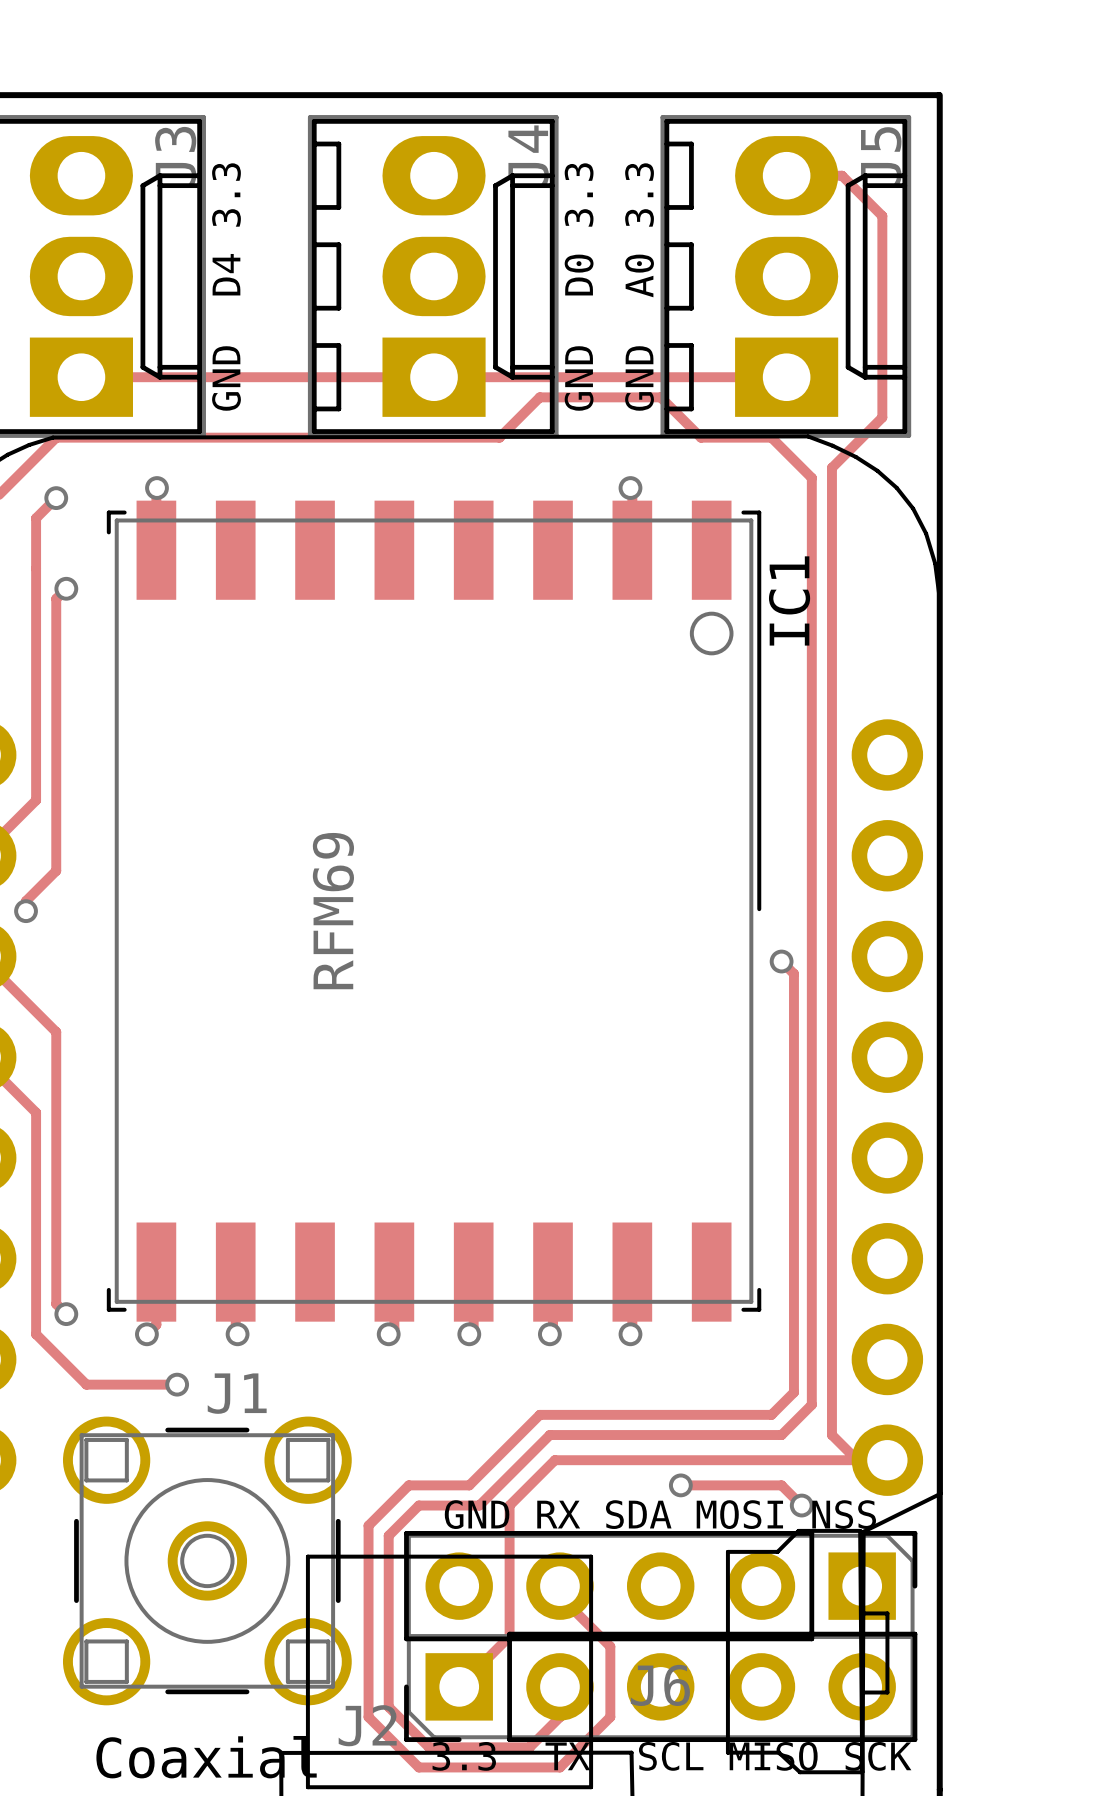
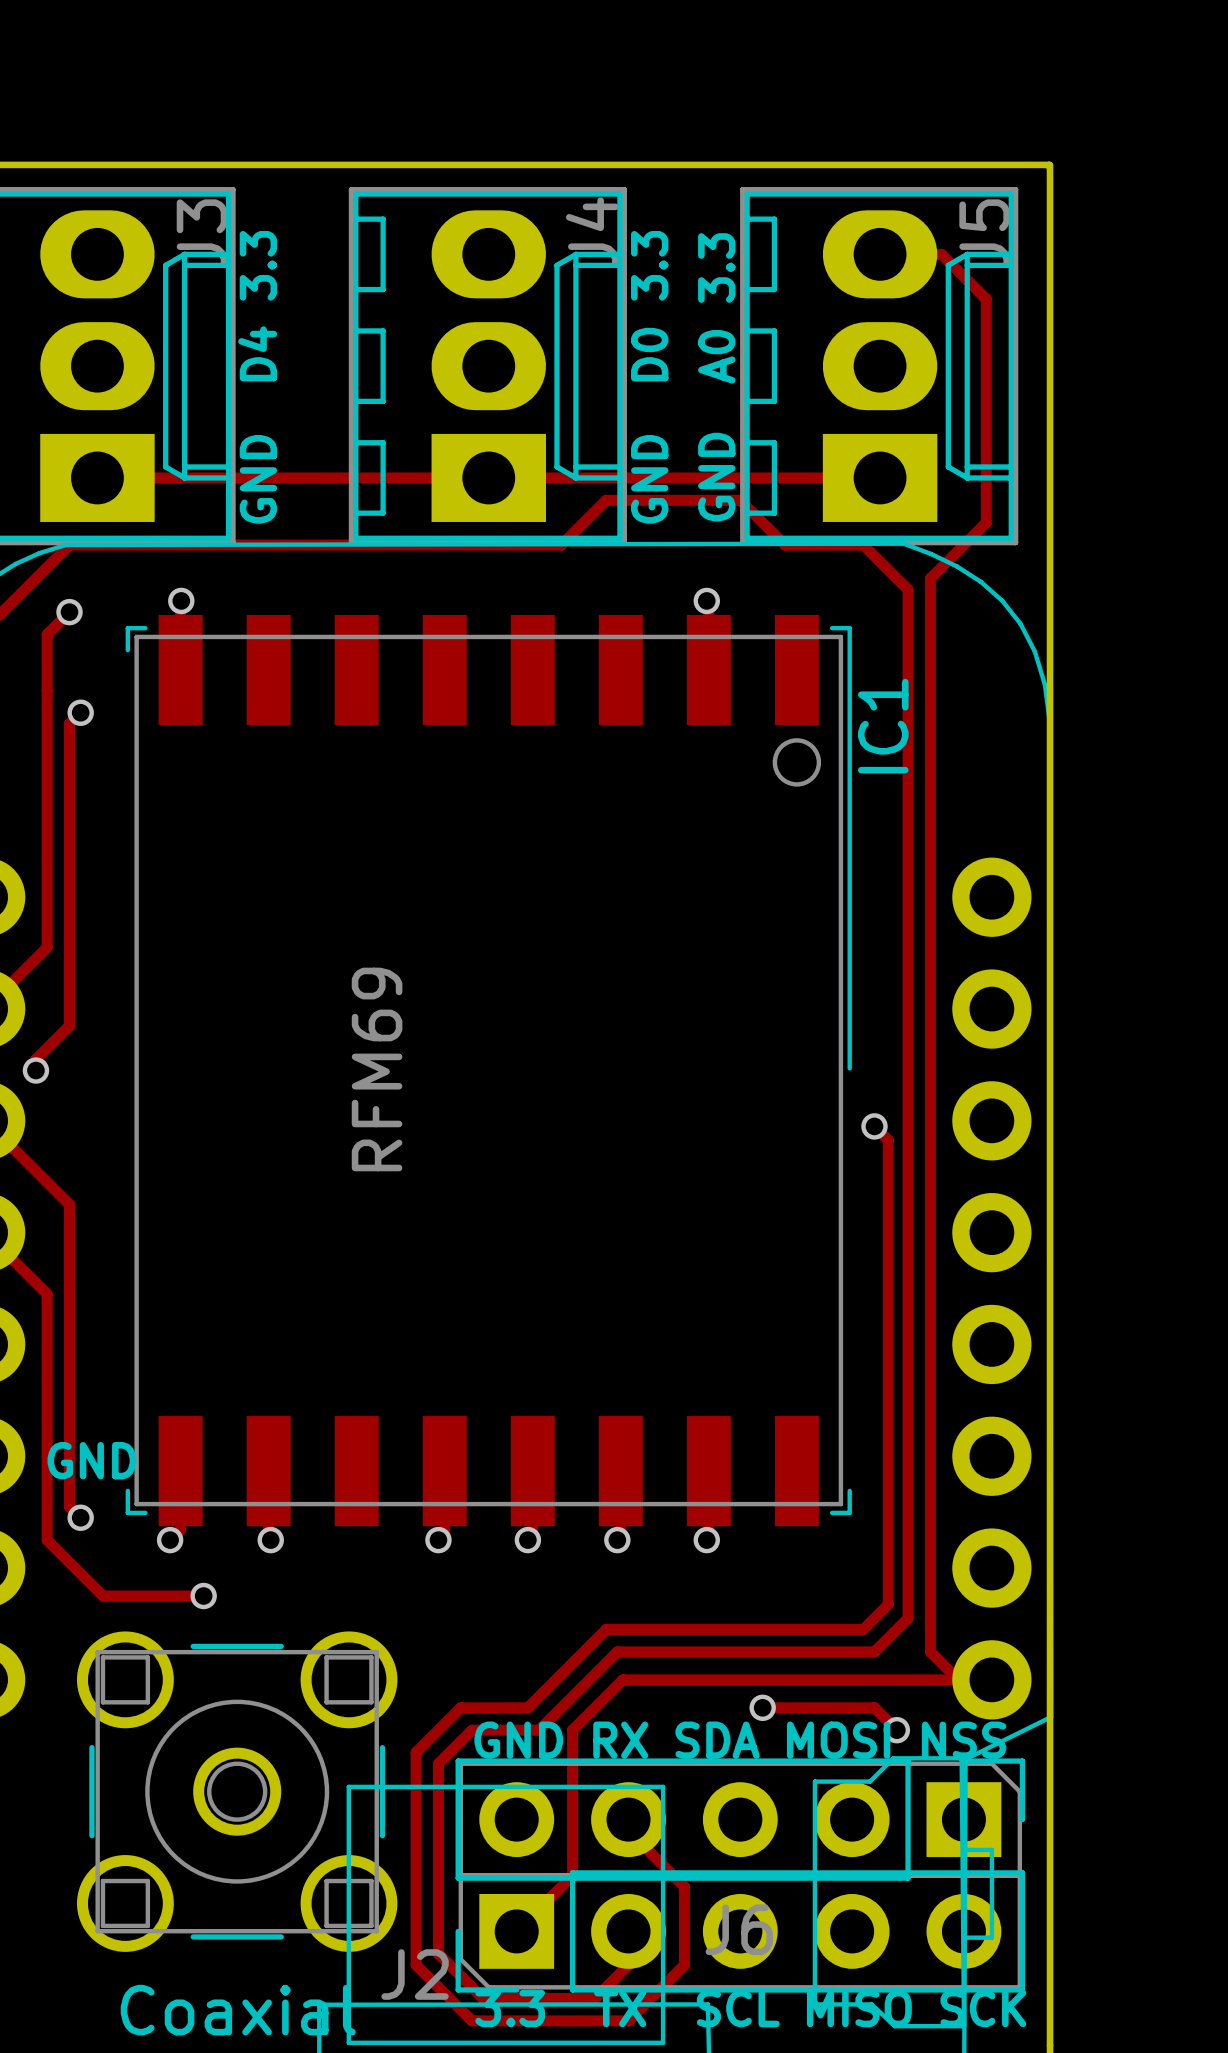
J1 text: none -> GND (91, 1460)
J1 name: J1 (237, 1393) -> none

